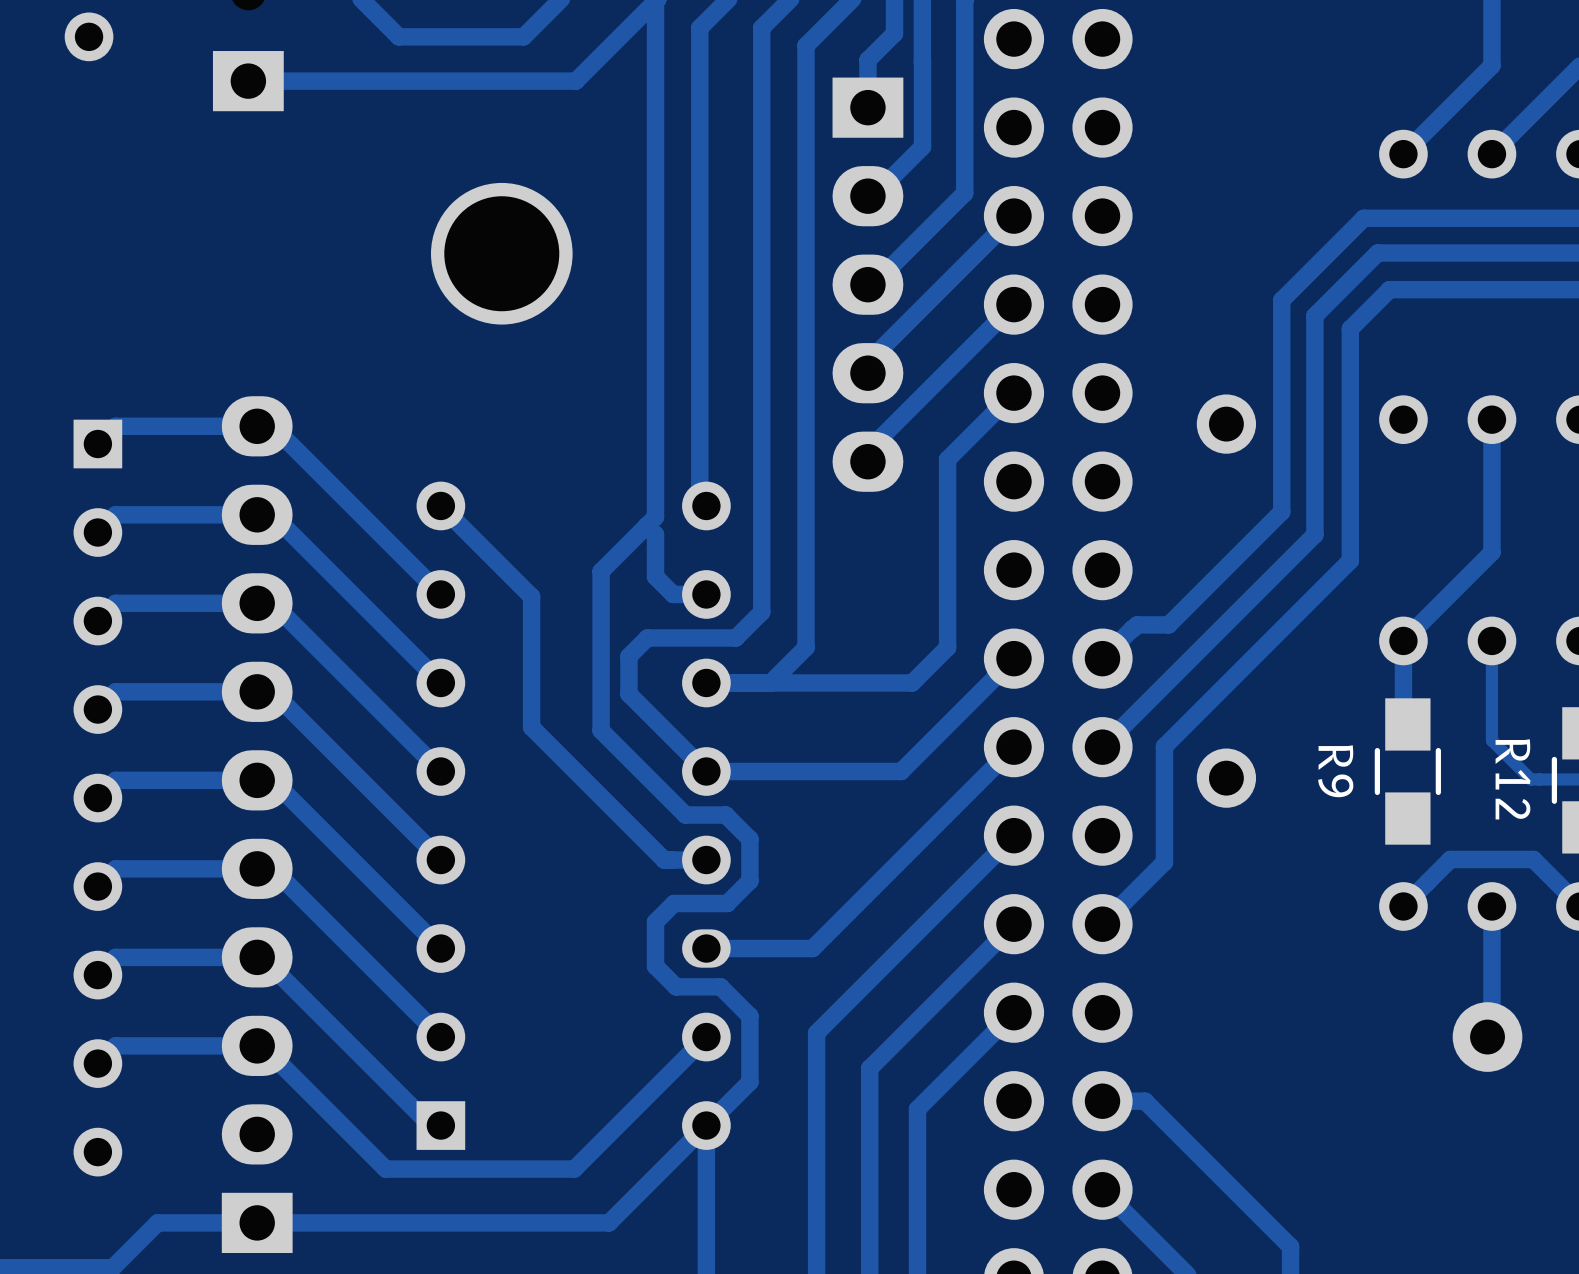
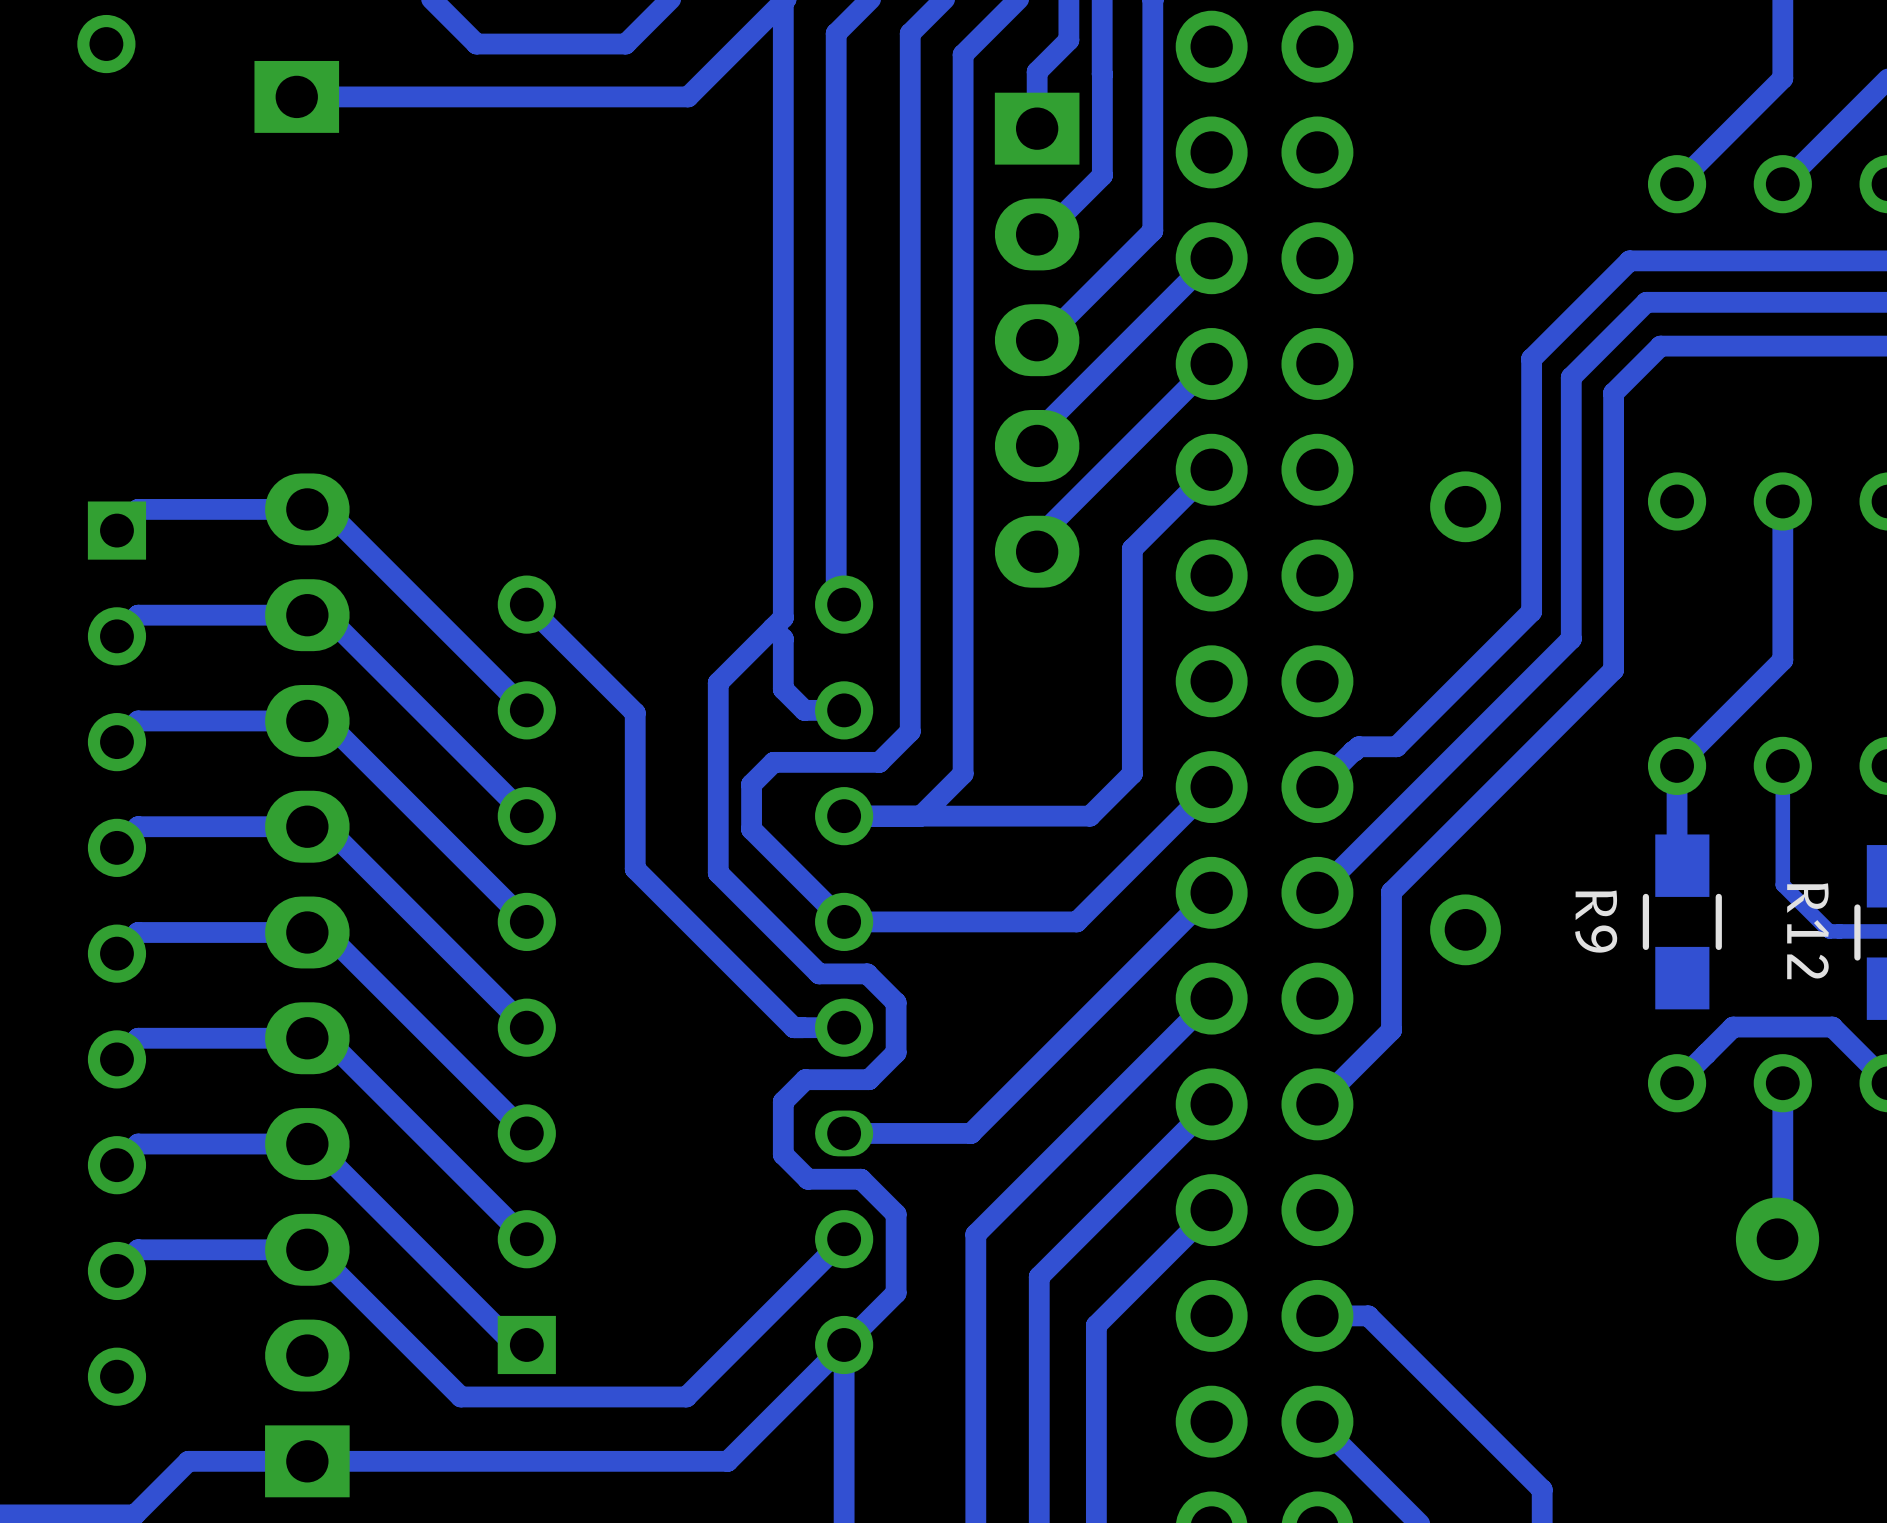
part: (501, 253) -> none

